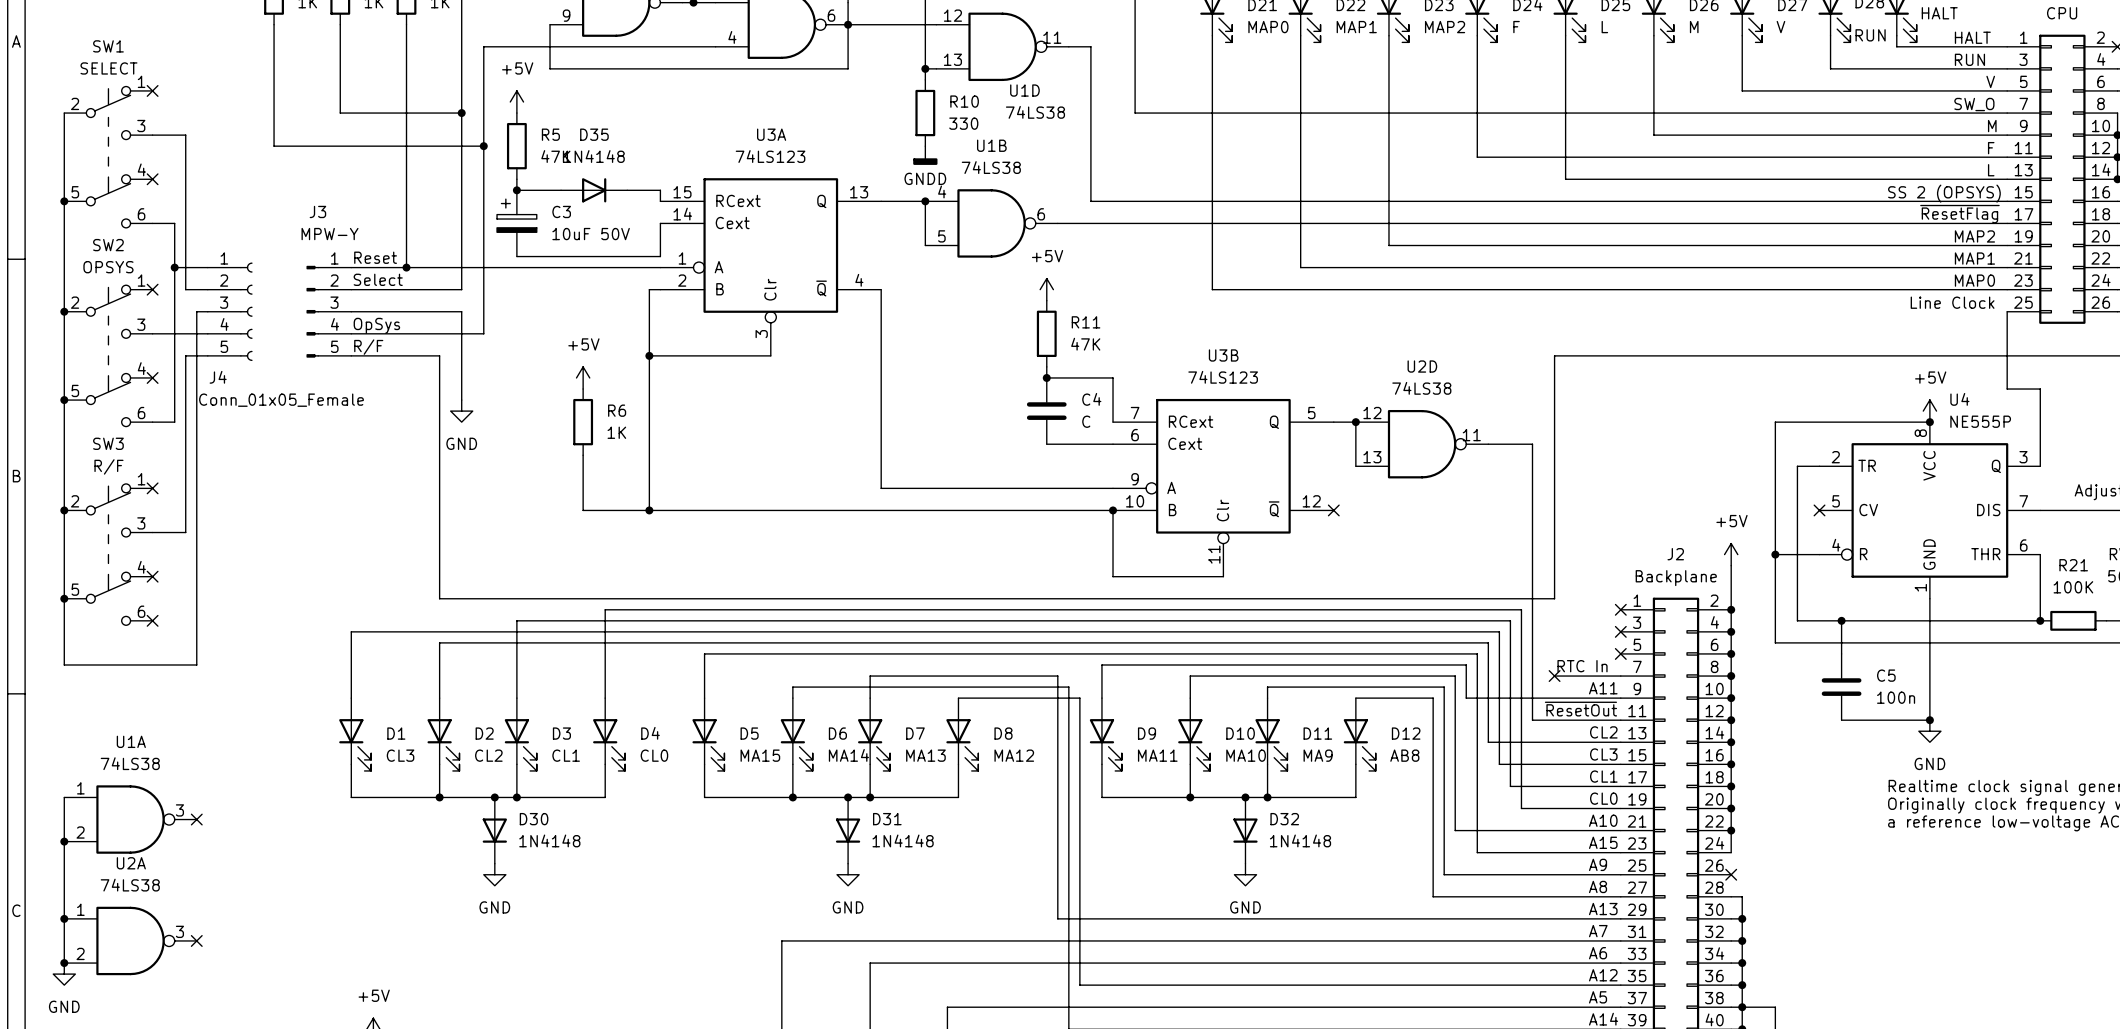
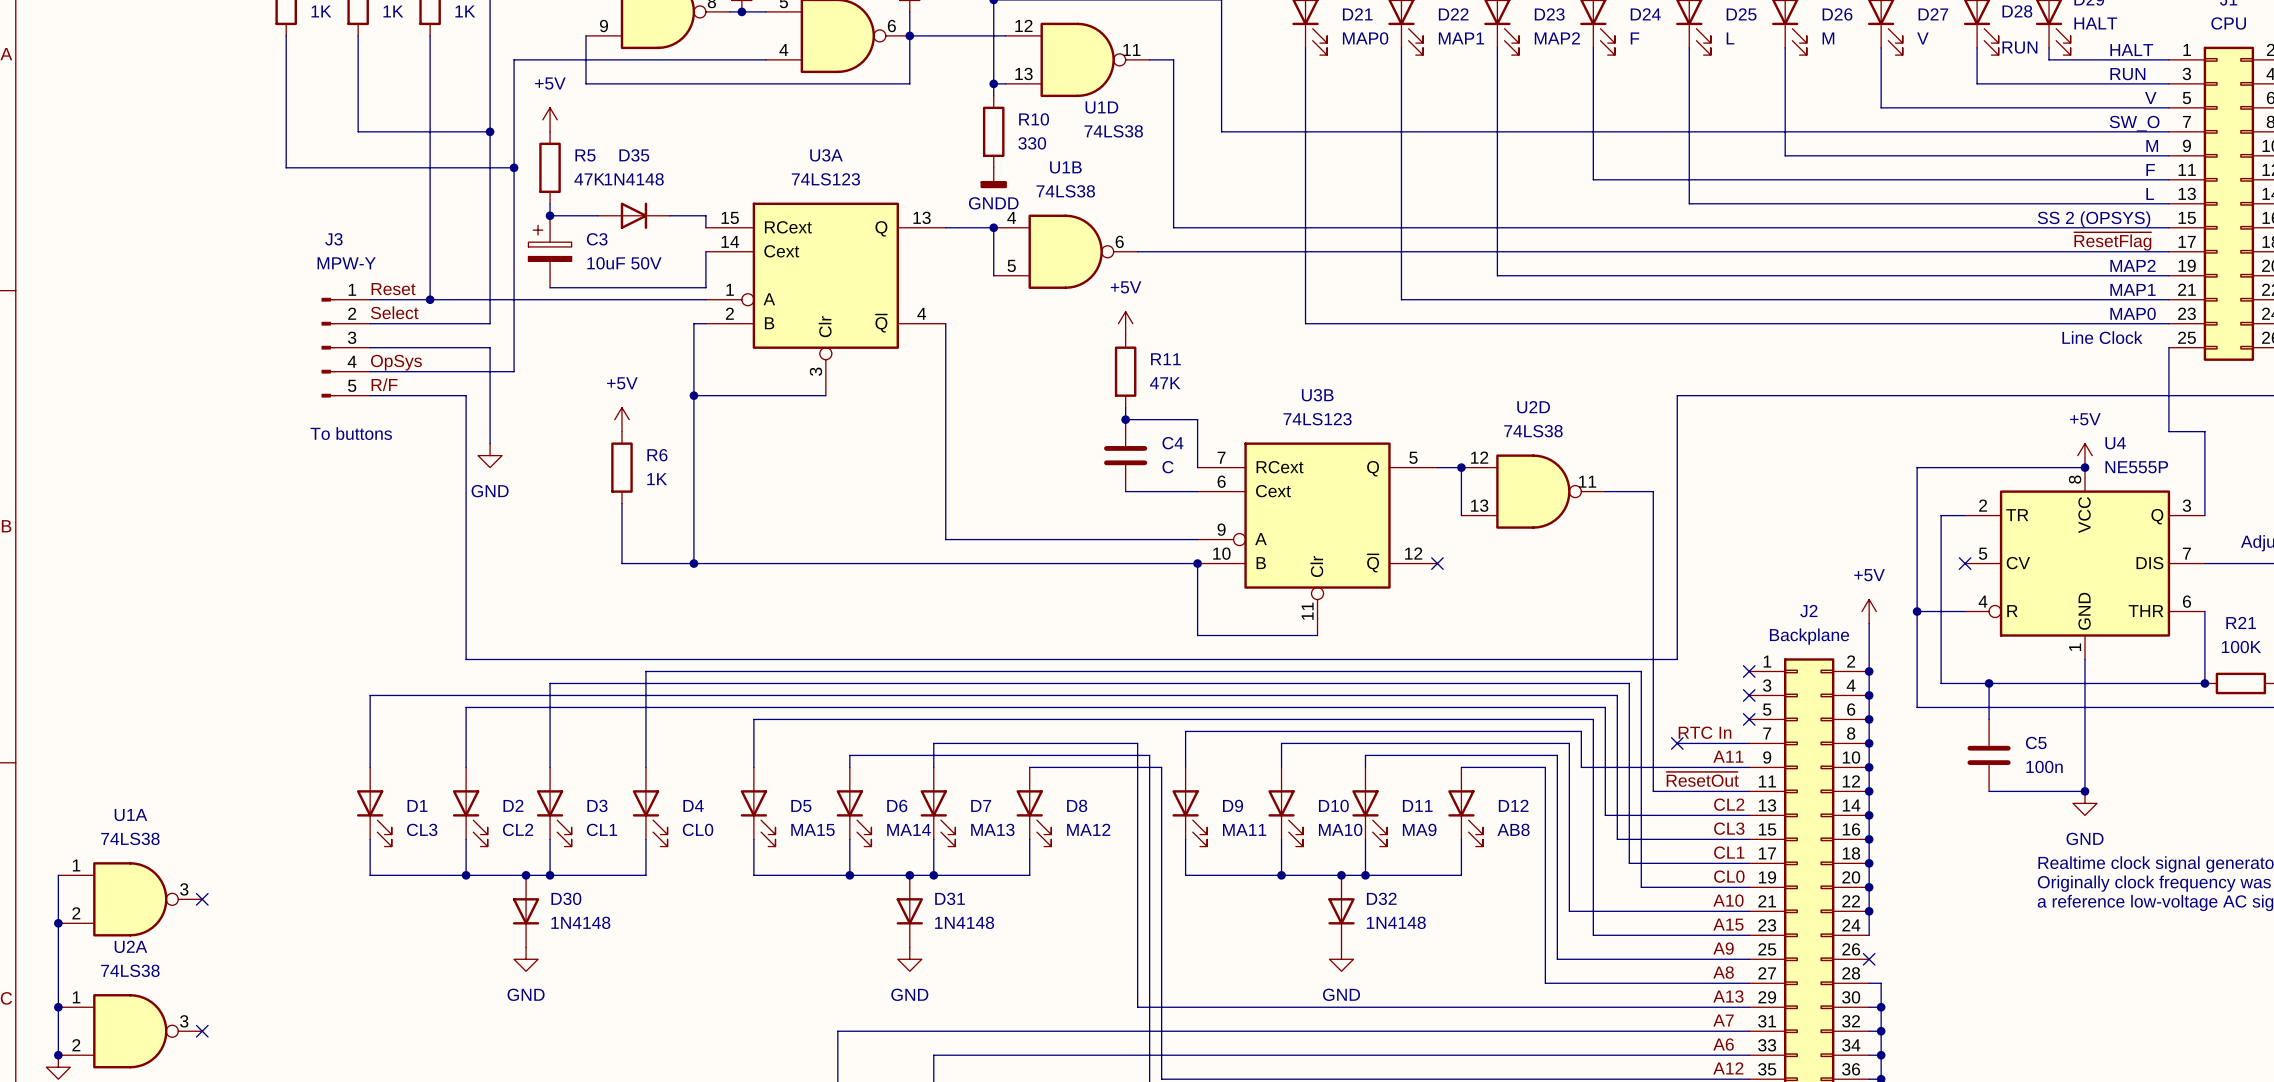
no-connect mark: (152, 90) -> none
wire: (64, 113) (64, 664) (196, 664) (196, 311) (207, 311) -> none
wire: (152, 135) (185, 135) (185, 289) (207, 289) -> none
SW1: SELECT (108, 157) -> none
no-connect mark: (152, 179) -> none
junction: (64, 201) -> none
wire: (152, 223) (174, 223) (174, 422) (152, 422) -> none
wire: (174, 267) (207, 267) -> none
junction: (174, 267) -> none
no-connect mark: (152, 289) -> none
junction: (64, 311) -> none
J4: Conn_01x05_Female (230, 311) -> none
wire: (152, 333) (207, 333) -> none
SW2: OPSYS (108, 355) -> none
wire: (207, 355) (185, 355) (185, 532) (152, 532) -> none
no-connect mark: (152, 377) -> none
text: none -> To buttons (351, 433)
junction: (64, 400) -> none
no-connect mark: (152, 488) -> none
junction: (64, 510) -> none
SW3: R/F (108, 554) -> none
no-connect mark: (152, 576) -> none
junction: (64, 598) -> none
no-connect mark: (152, 620) -> none

